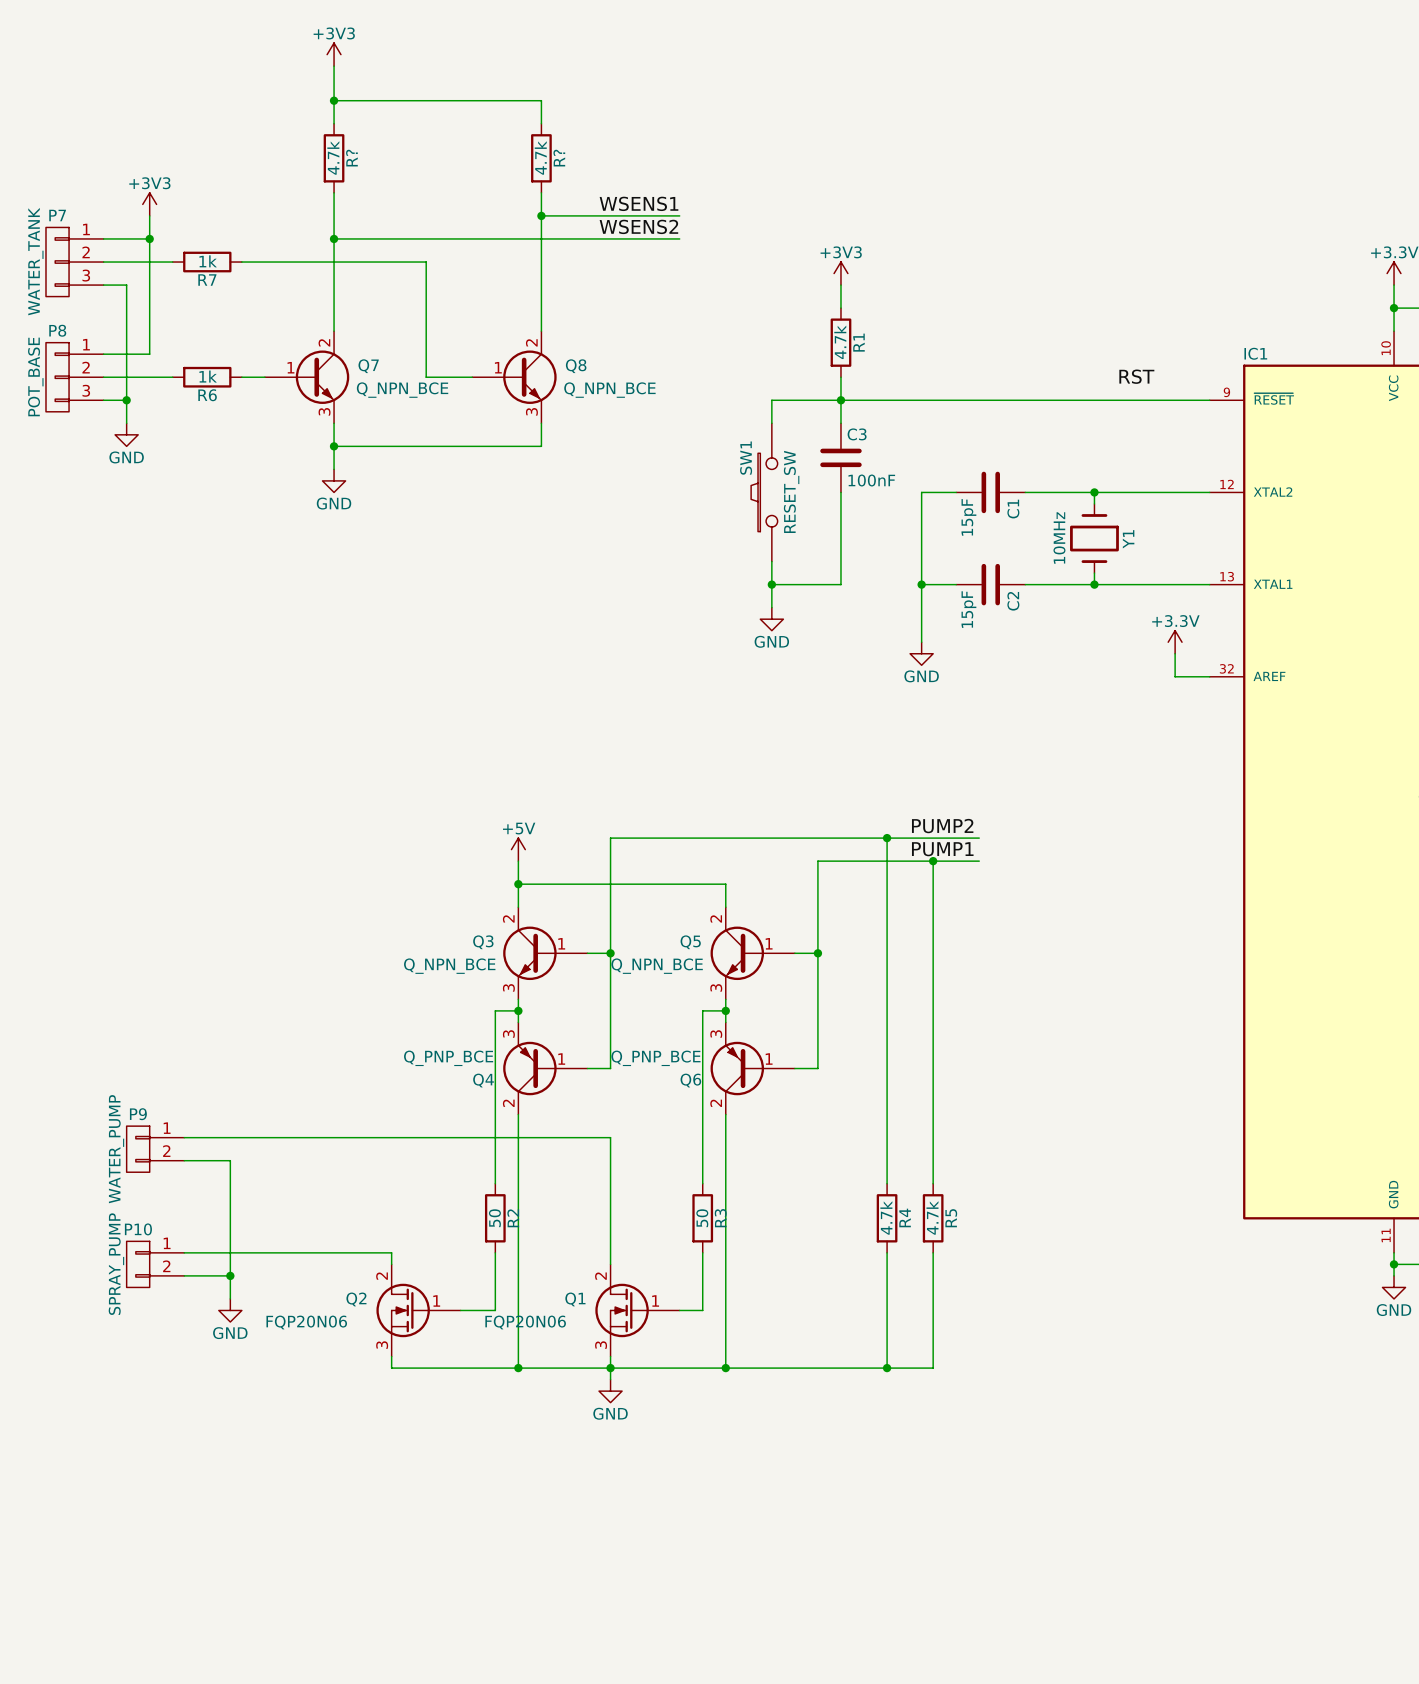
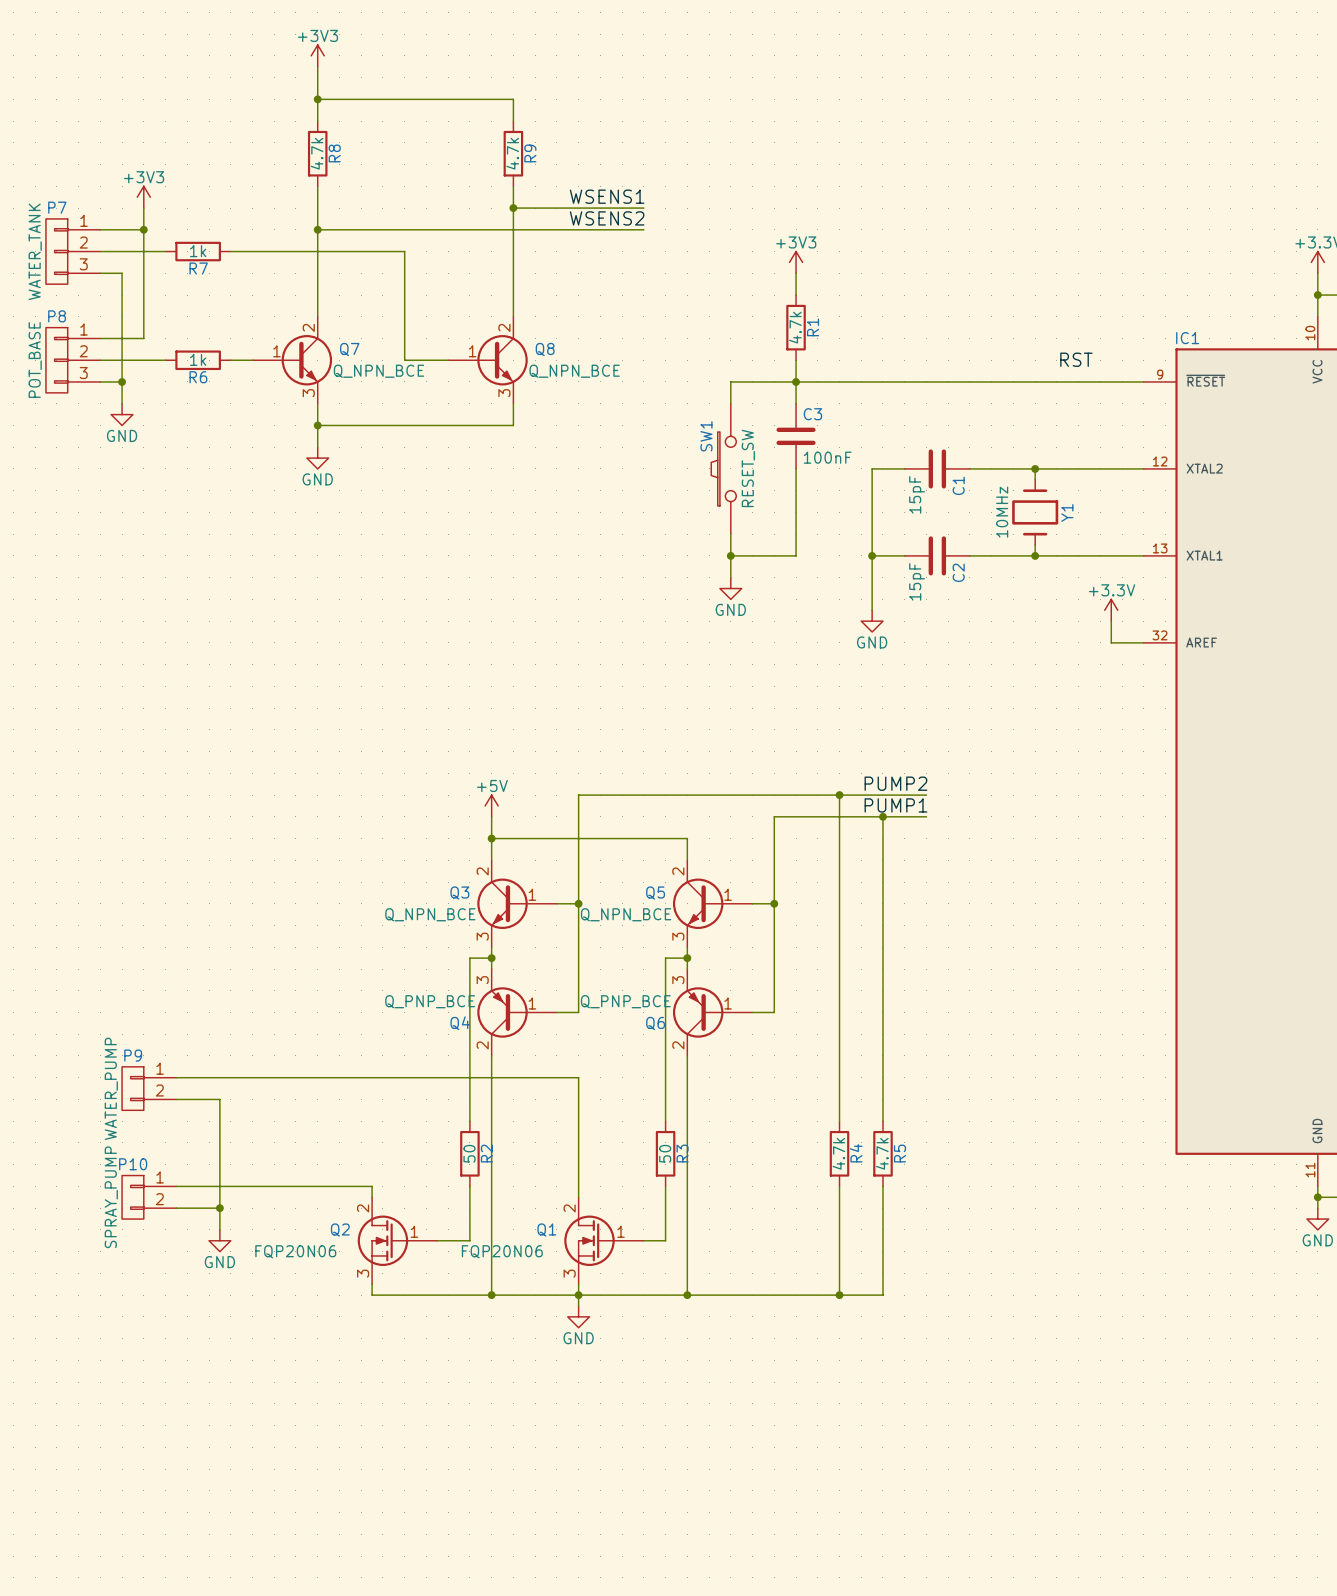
R? name: R? (351, 158) -> R8 (334, 153)
R? name: R? (559, 158) -> R9 (530, 153)

